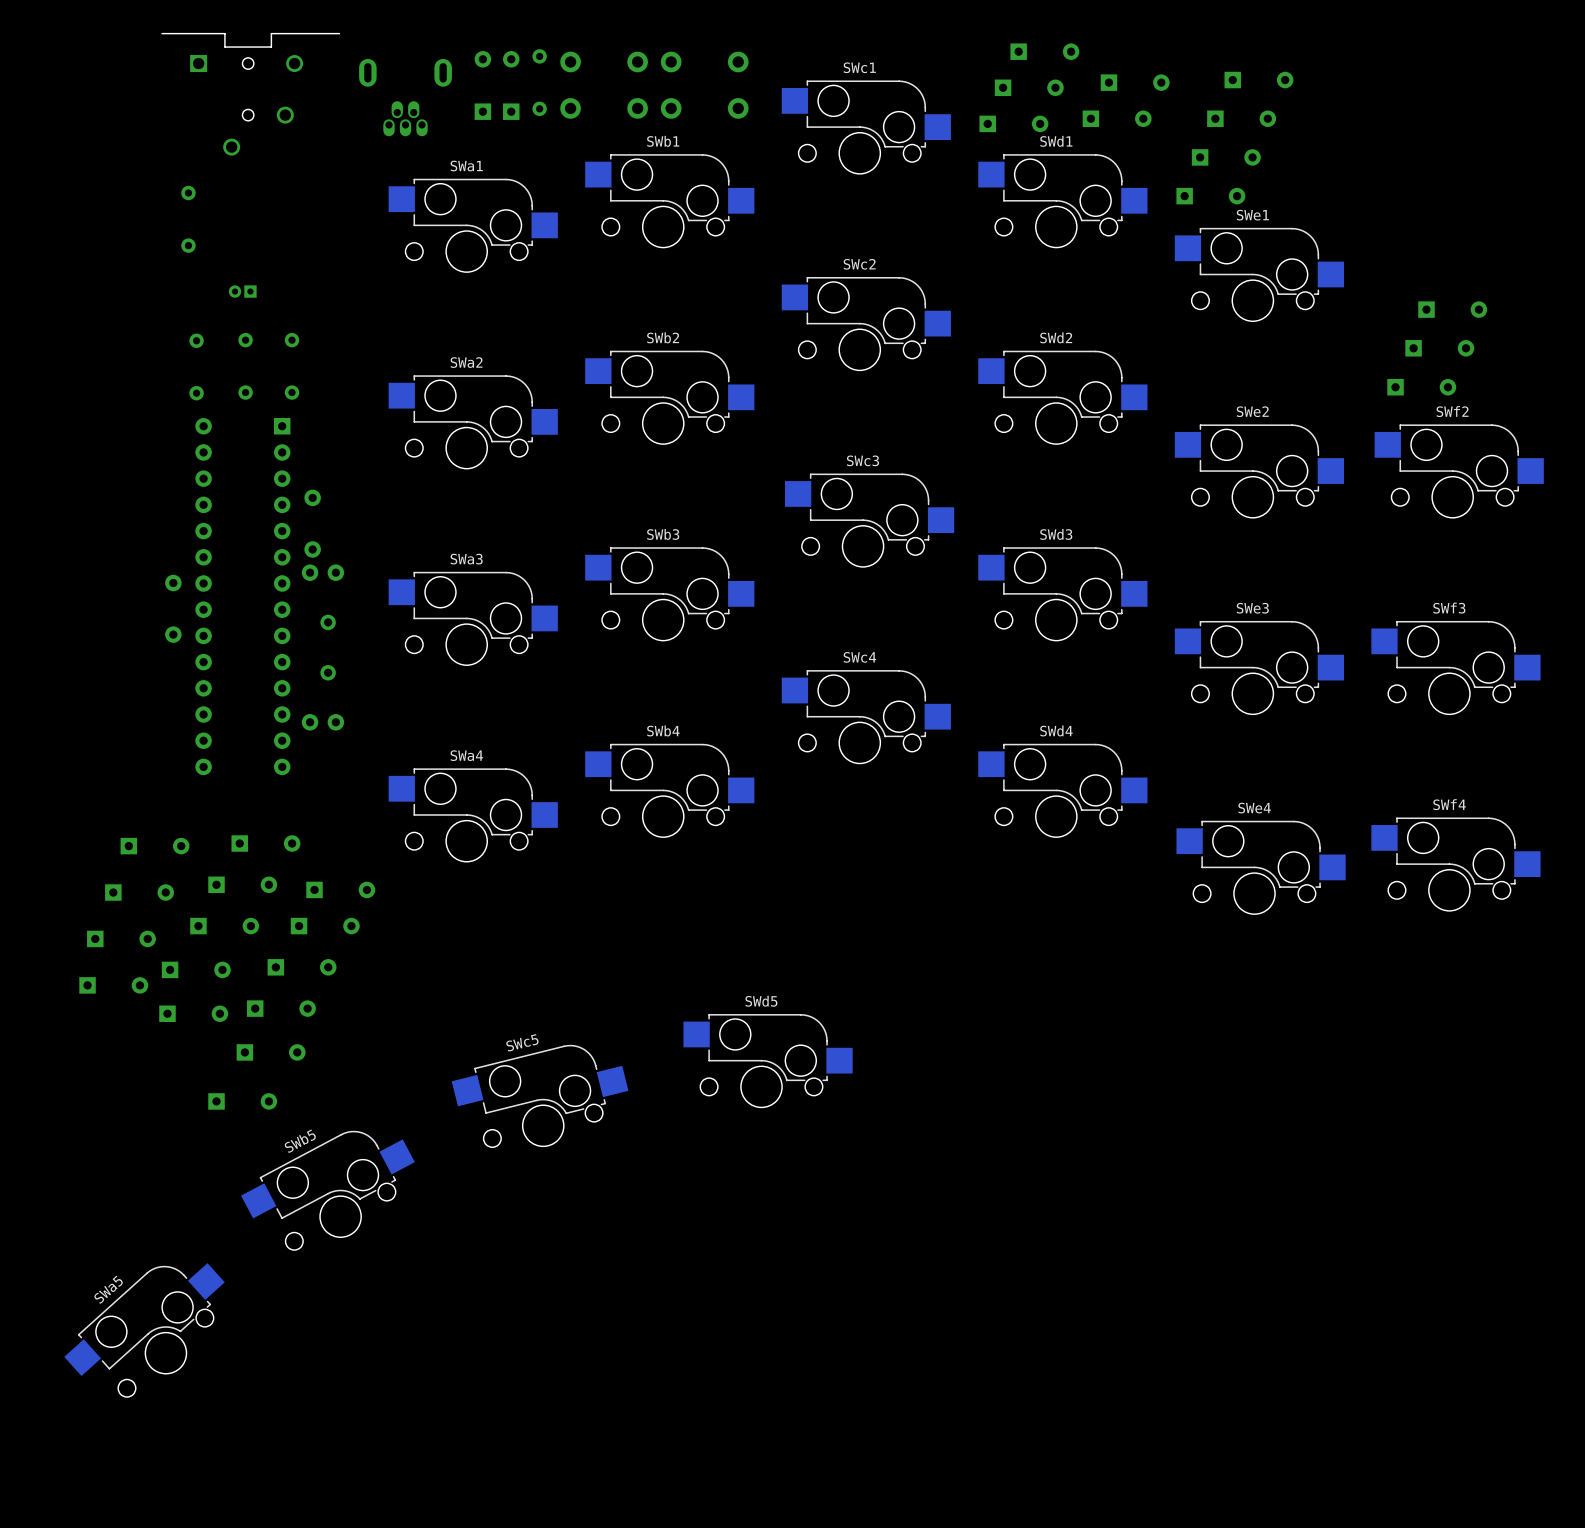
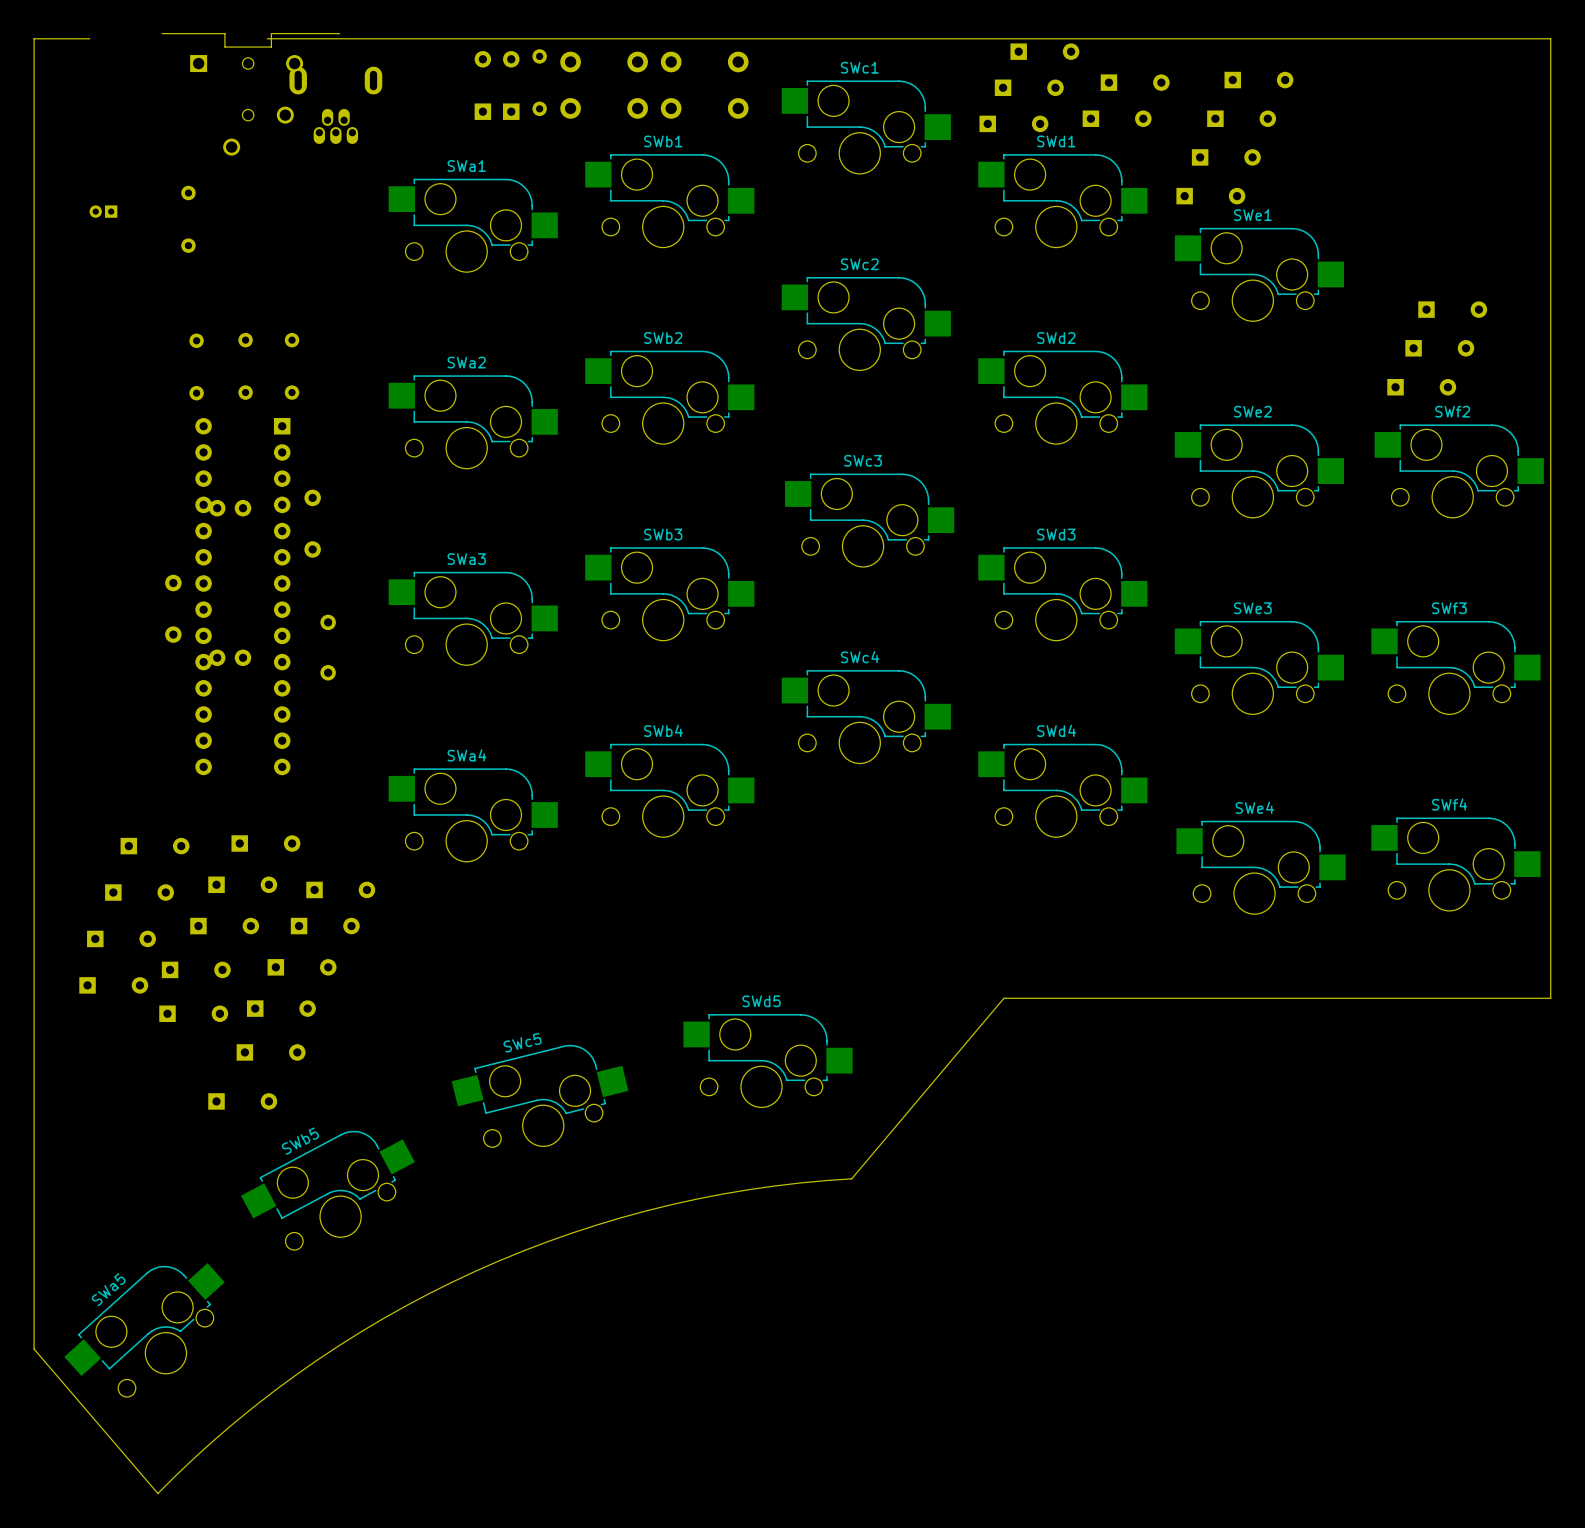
board edge: none -> (267, 38) (1550, 38) (1550, 998) (1003, 998) (851, 1178) (748, 1189) (646, 1210) (572, 1233) (475, 1271) (383, 1318) (317, 1360) (234, 1422) (157, 1493) (34, 1349) (34, 38) (89, 38)
part position: (405, 97) -> (335, 105)
part position: (242, 291) -> (103, 211)
part: none -> (230, 508)
part: (322, 572) -> none
part: none -> (230, 657)
part: (322, 722) -> none

